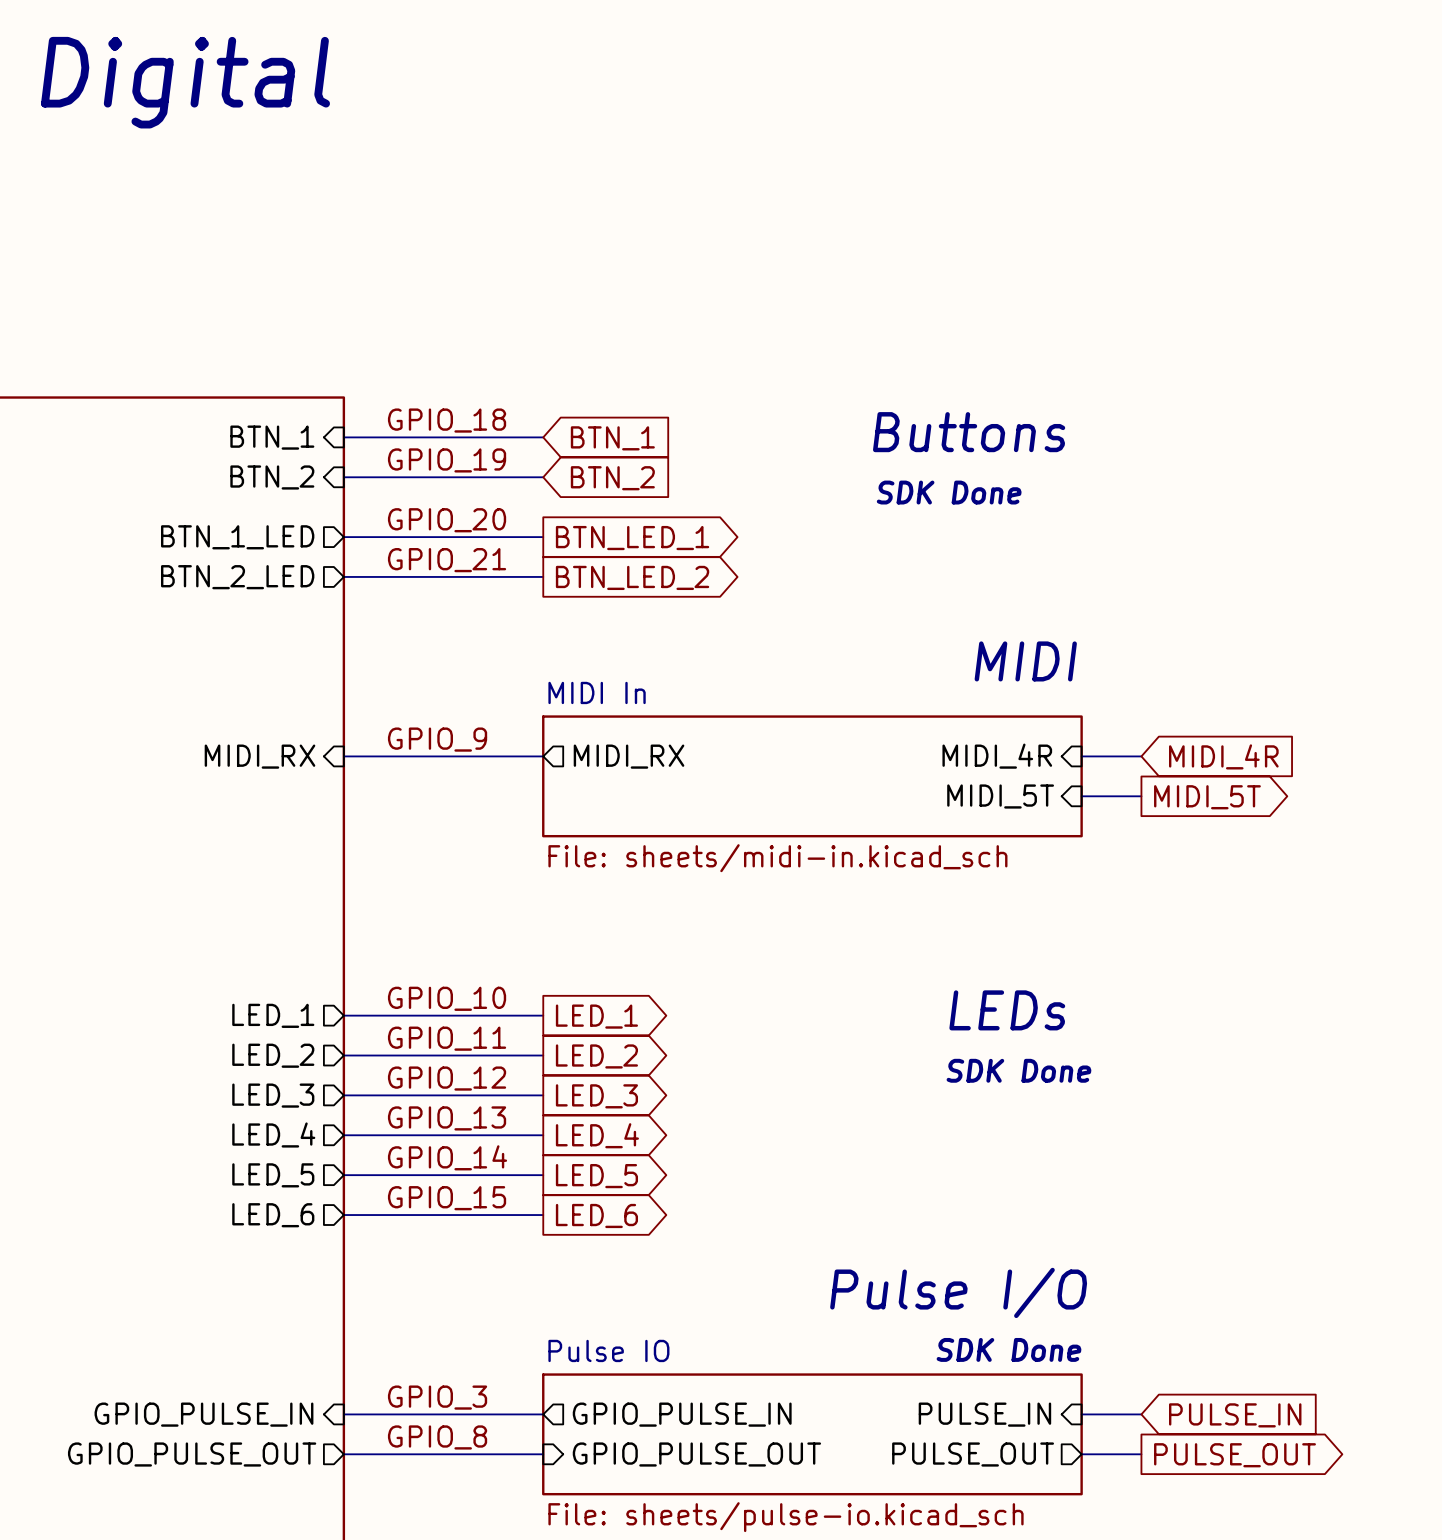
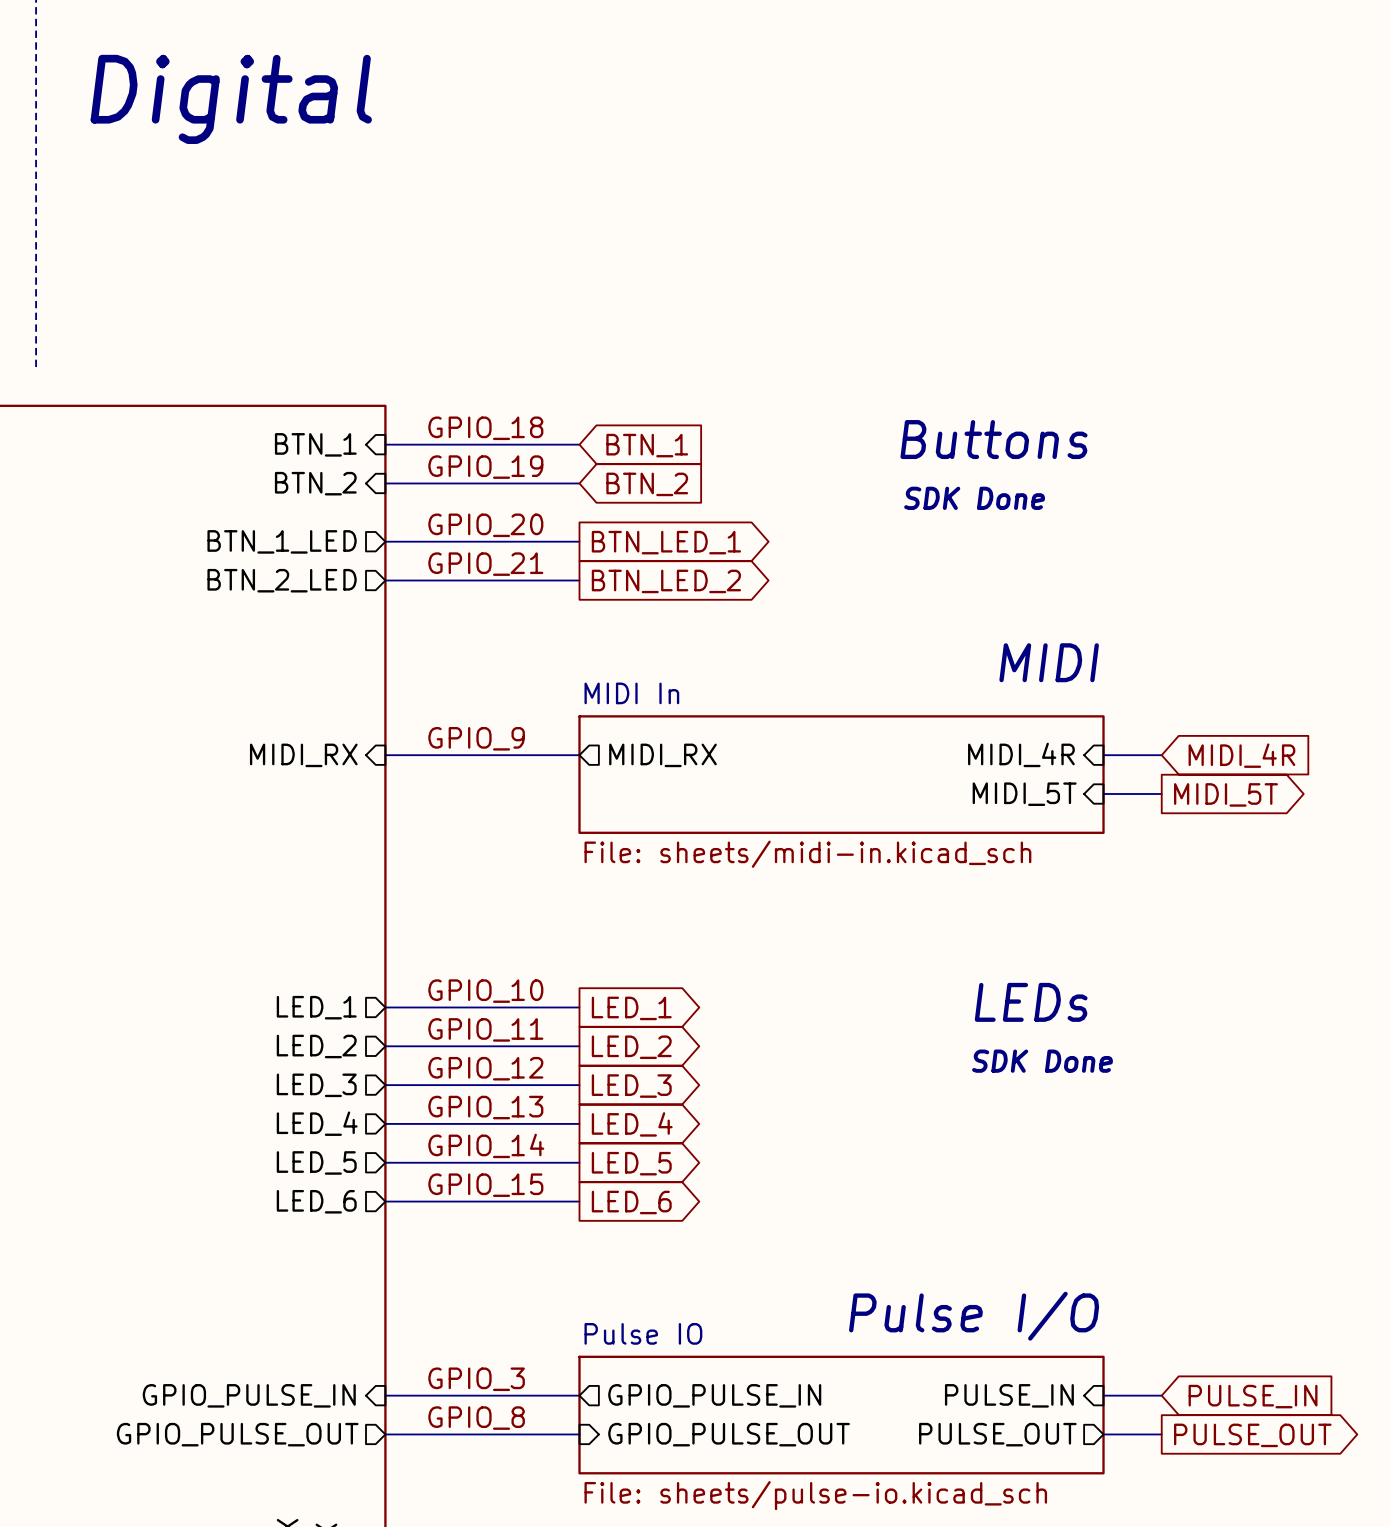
text position: Pulse I/O (958, 1292) -> Pulse I/O (974, 1316)
text: SDK Done (1009, 1349) -> none

